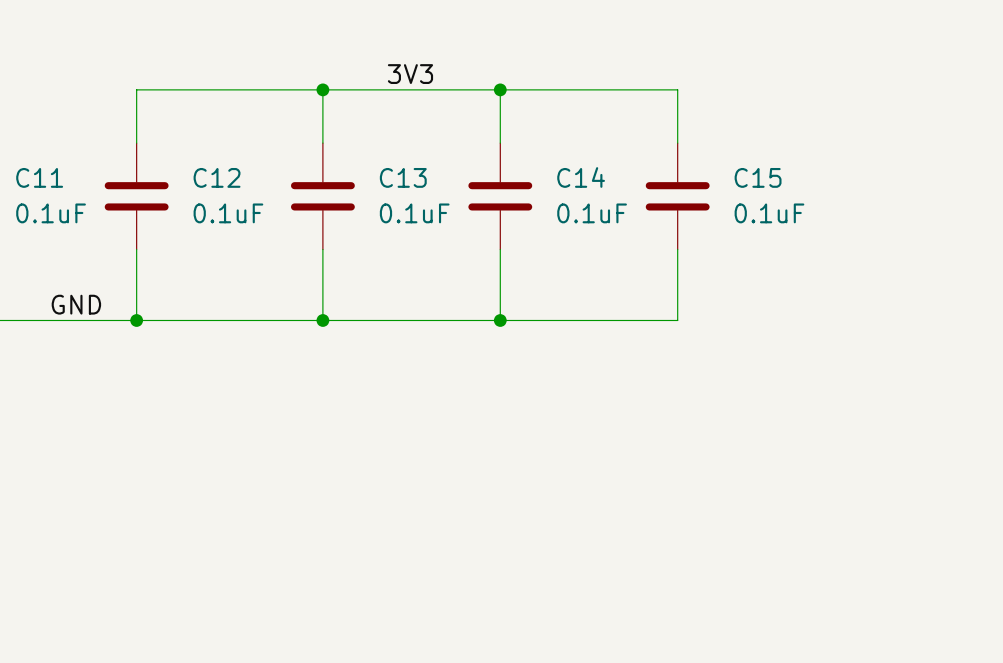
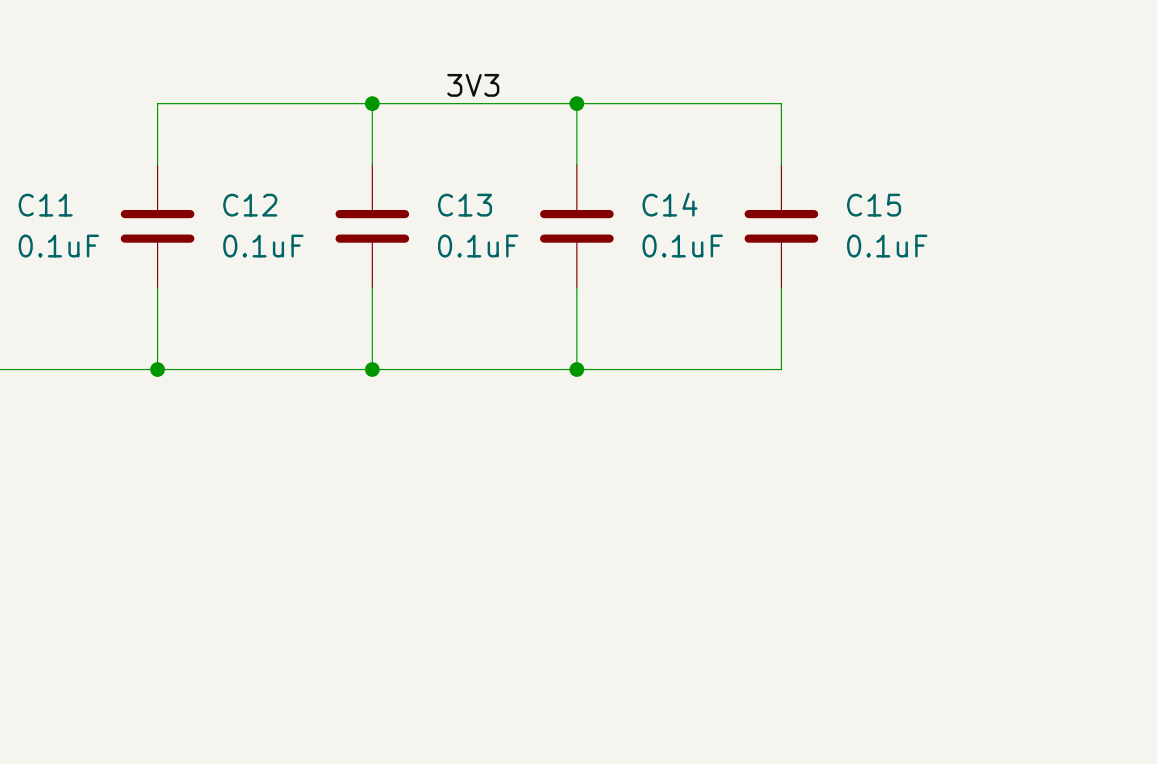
label: GND (76, 304) -> none

